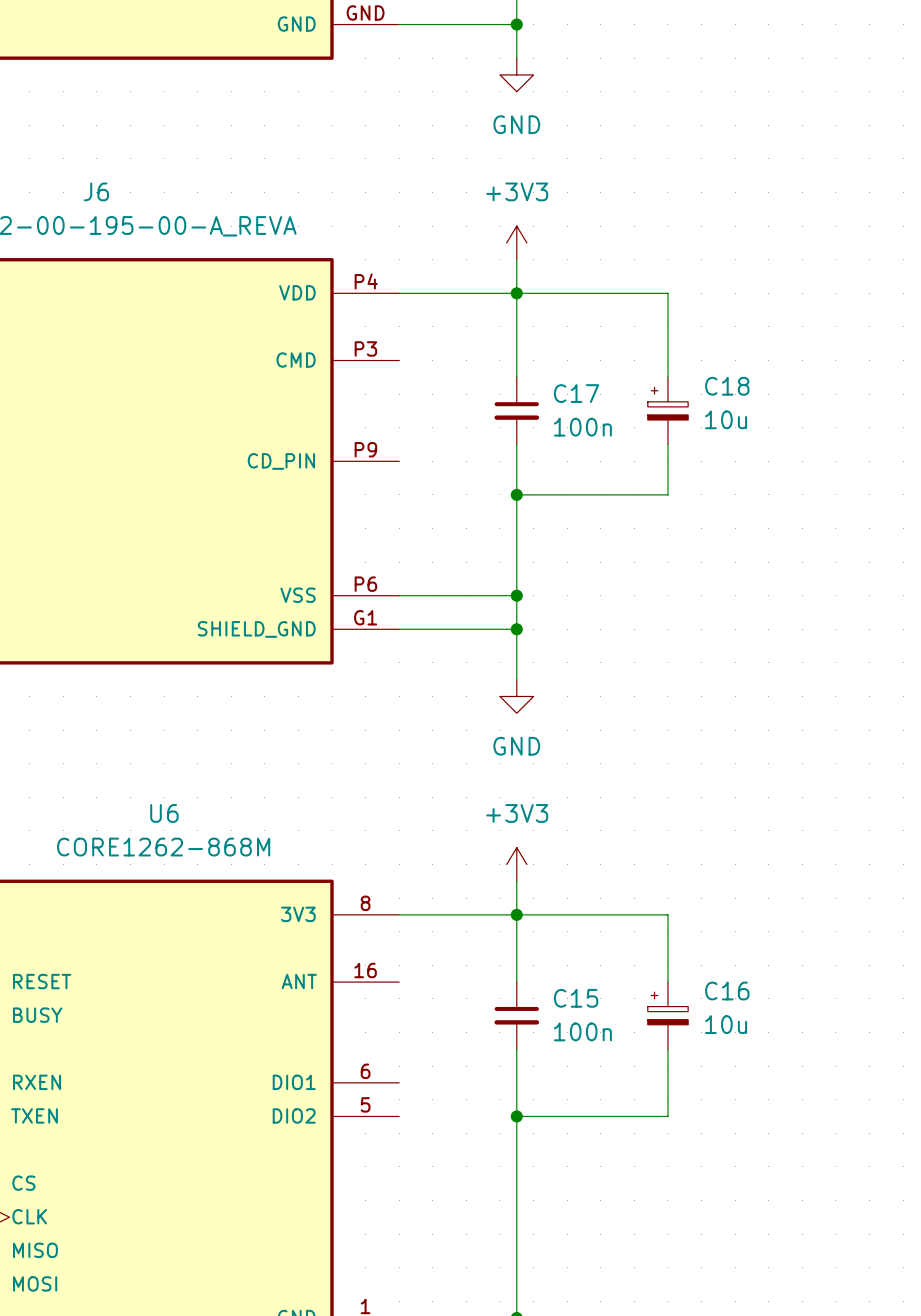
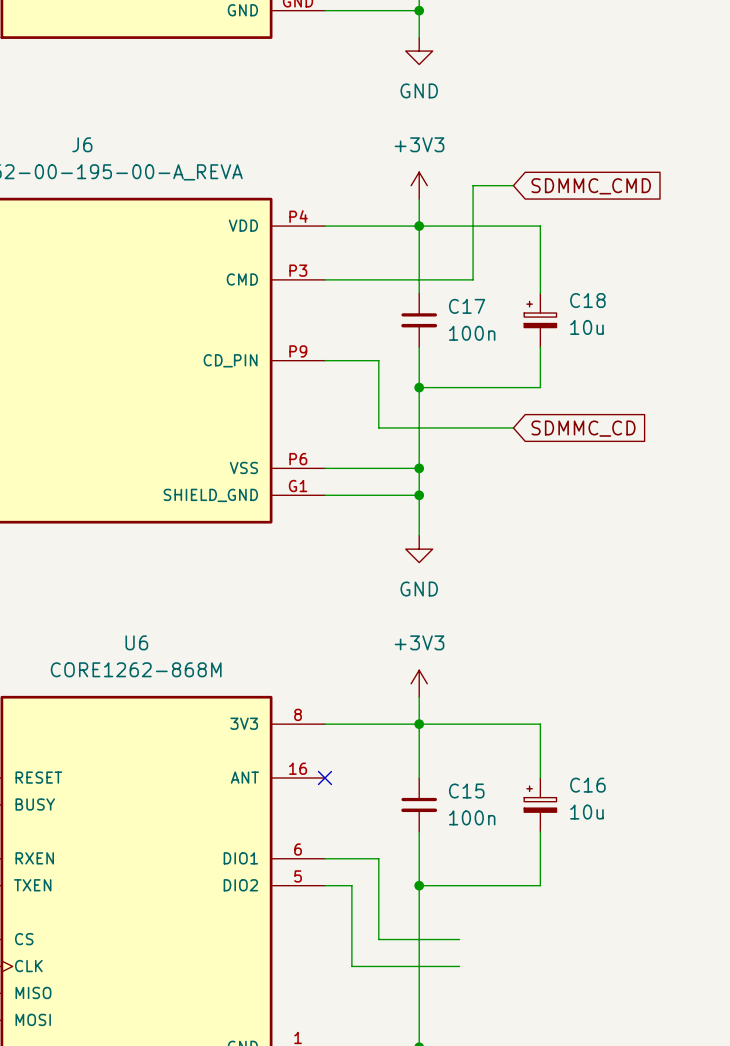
wire: none -> (513, 185) (473, 185) (473, 279) (324, 279)
global label: none -> SDMMC_CMD (591, 186)
wire: none -> (324, 360) (378, 360) (378, 427) (513, 427)
global label: none -> SDMMC_CD (583, 428)
no-connect mark: none -> (324, 777)
wire: none -> (324, 858) (378, 858) (378, 939) (459, 939)
wire: none -> (324, 885) (351, 885) (351, 966) (459, 966)

